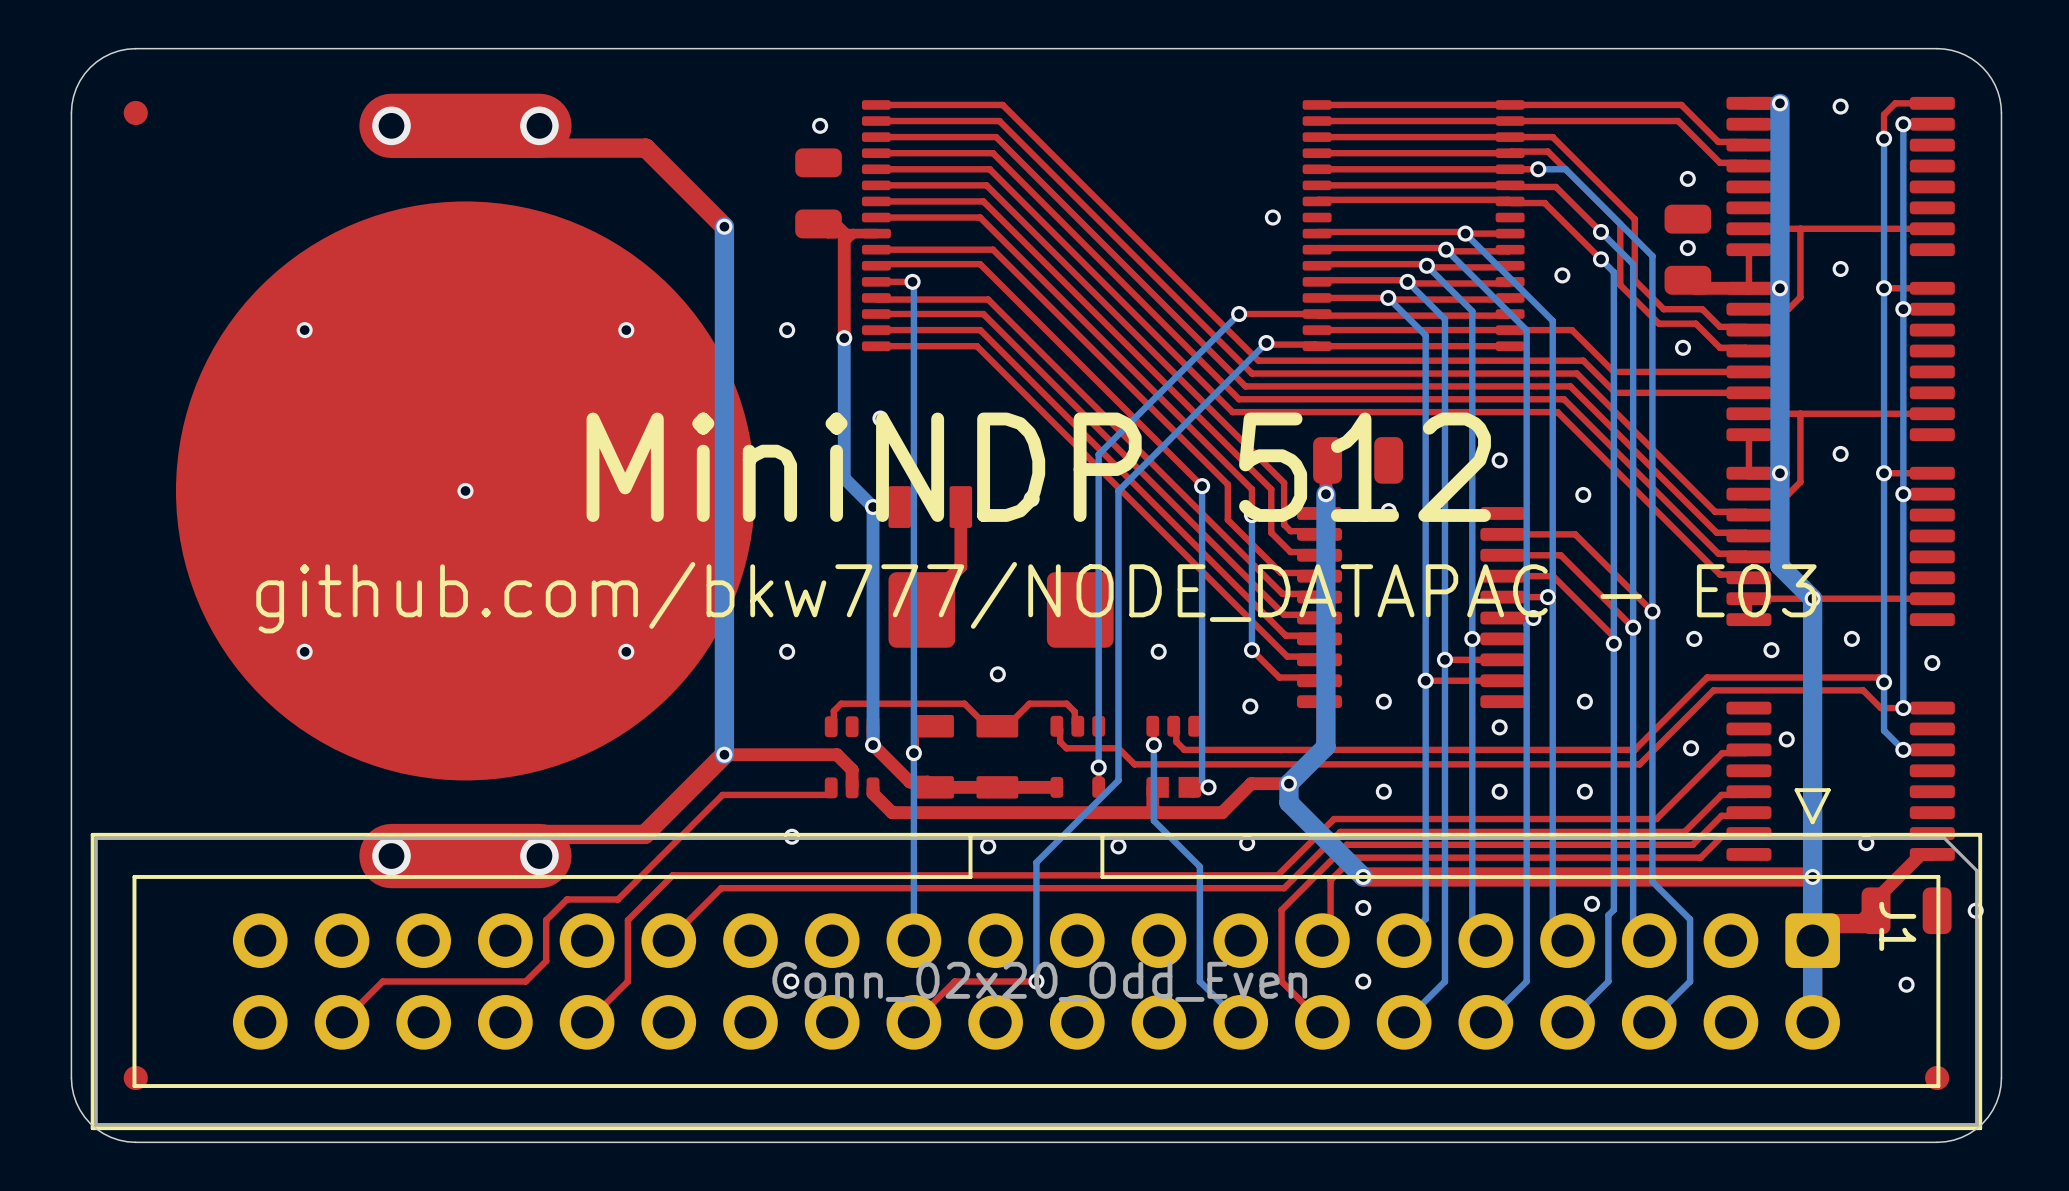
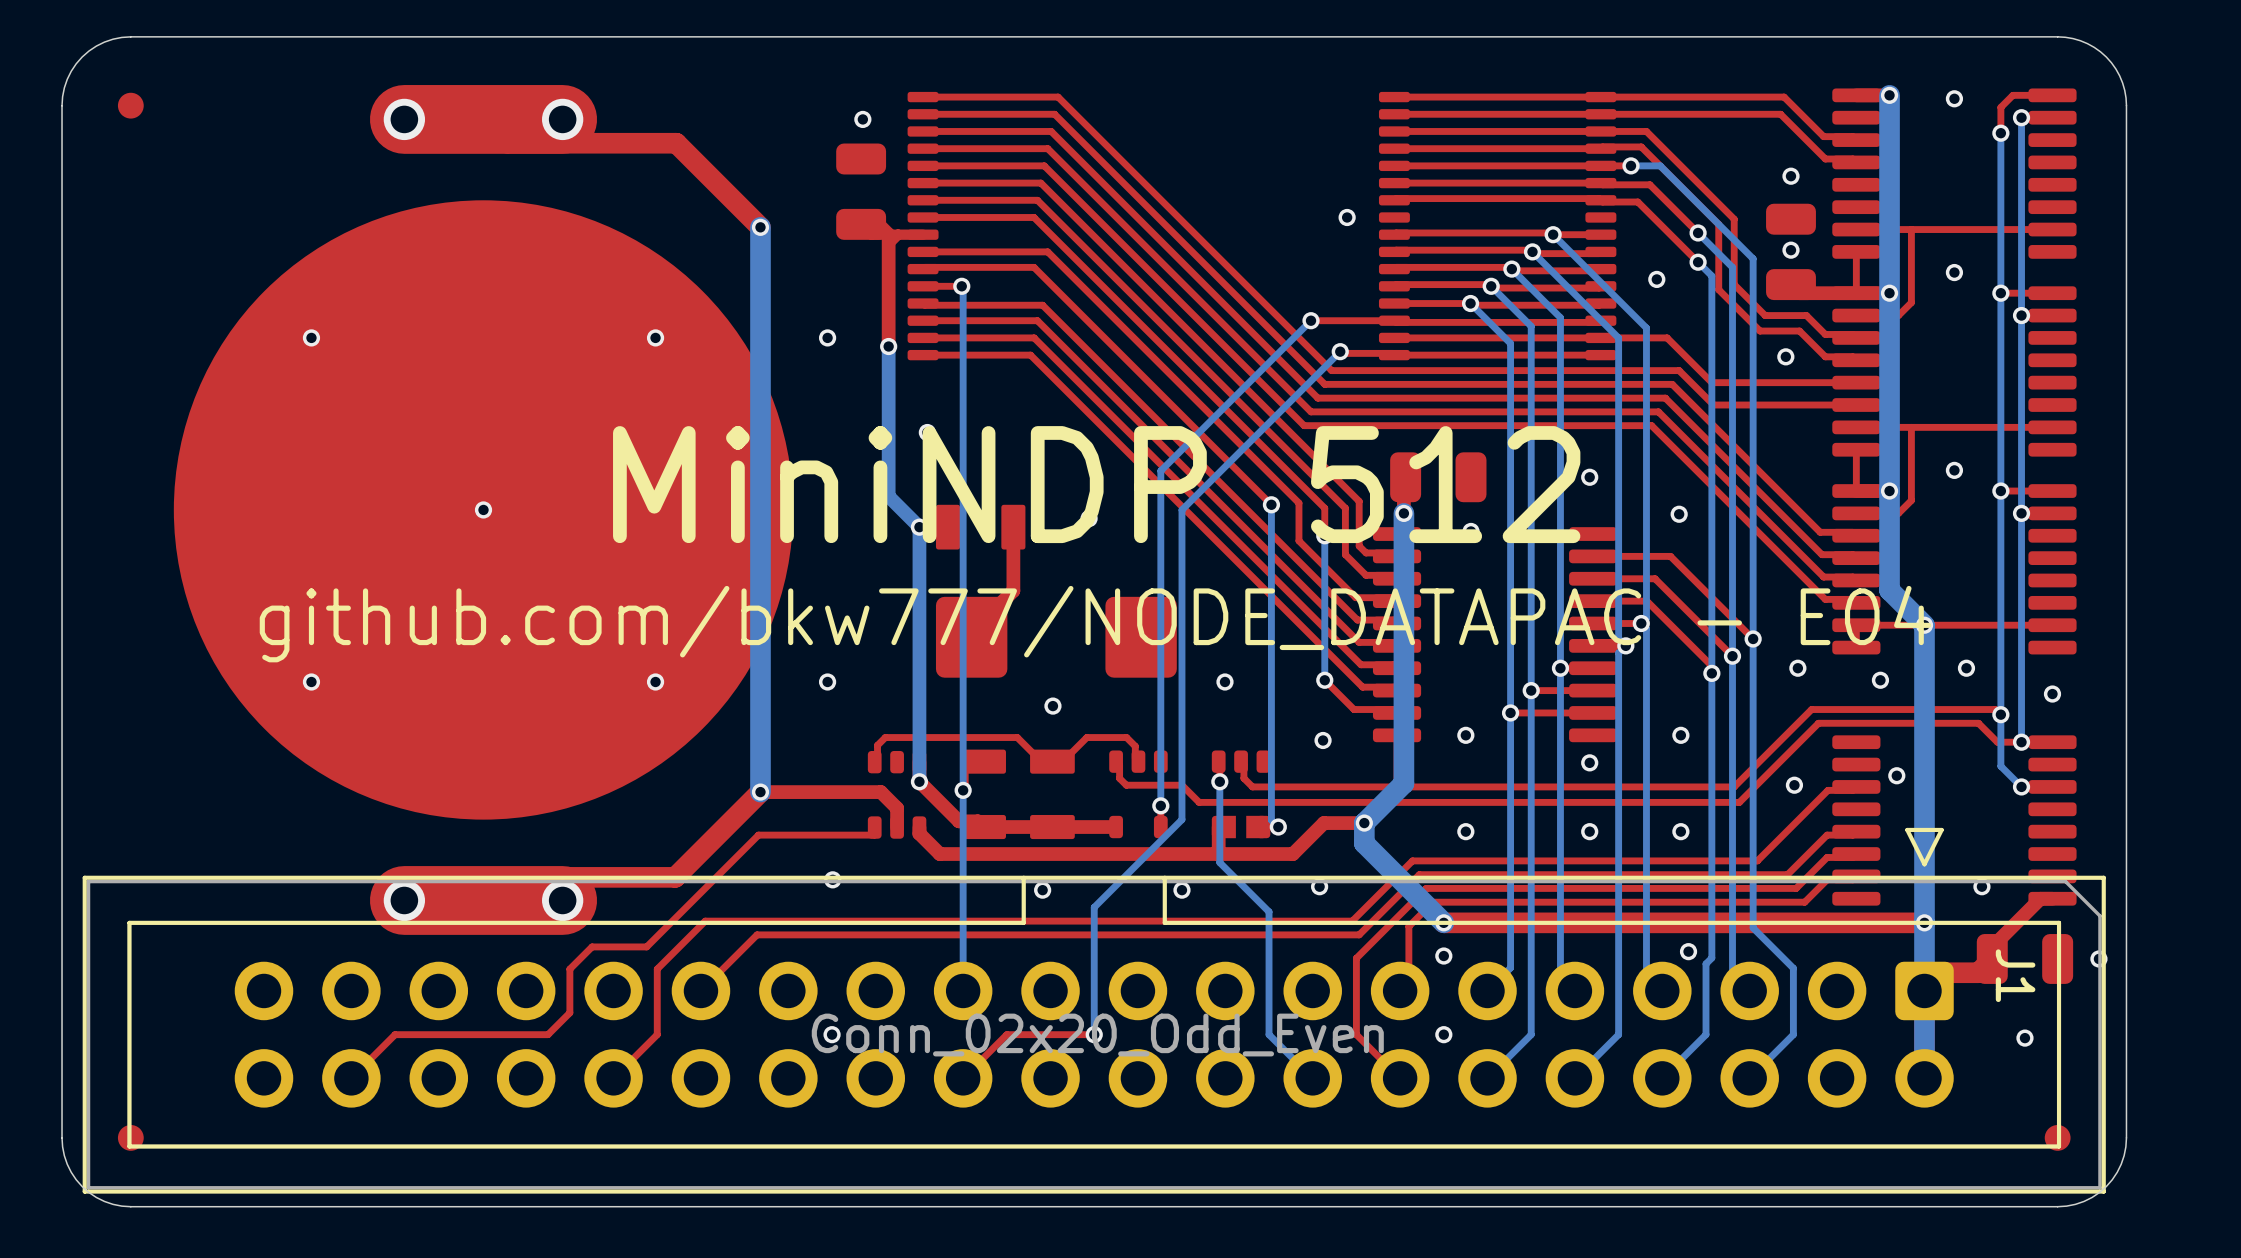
text: github.com/bkw777/NODE_DATAPAC - E03 (1036, 597) -> github.com/bkw777/NODE_DATAPAC - E04 (1095, 624)

